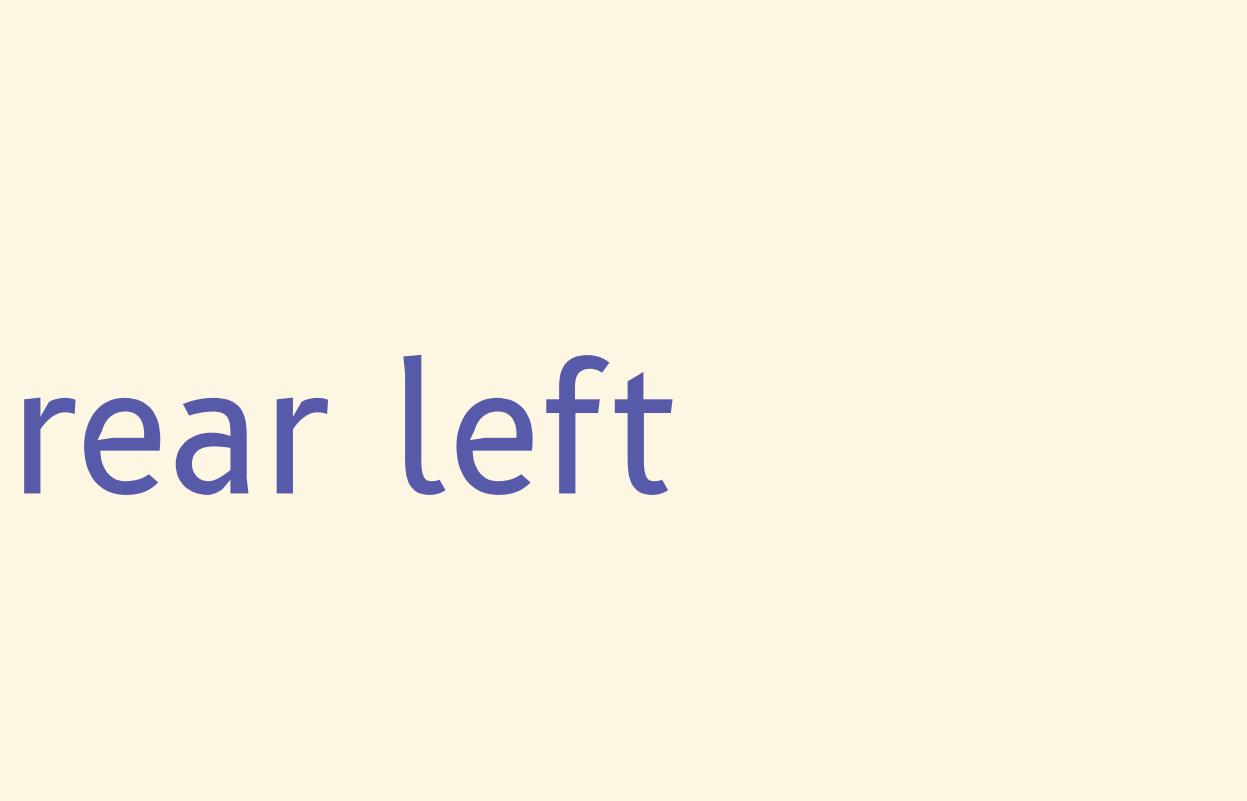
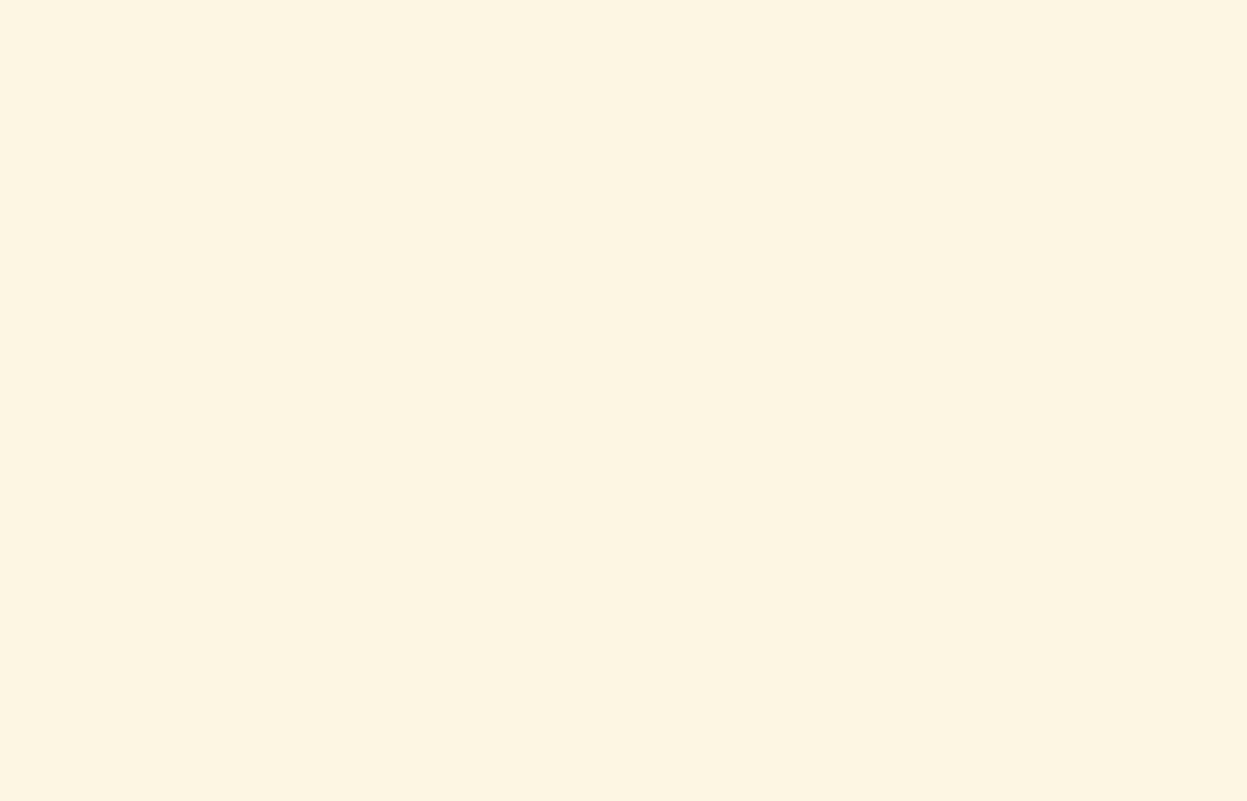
text: rear left (348, 424) -> none

